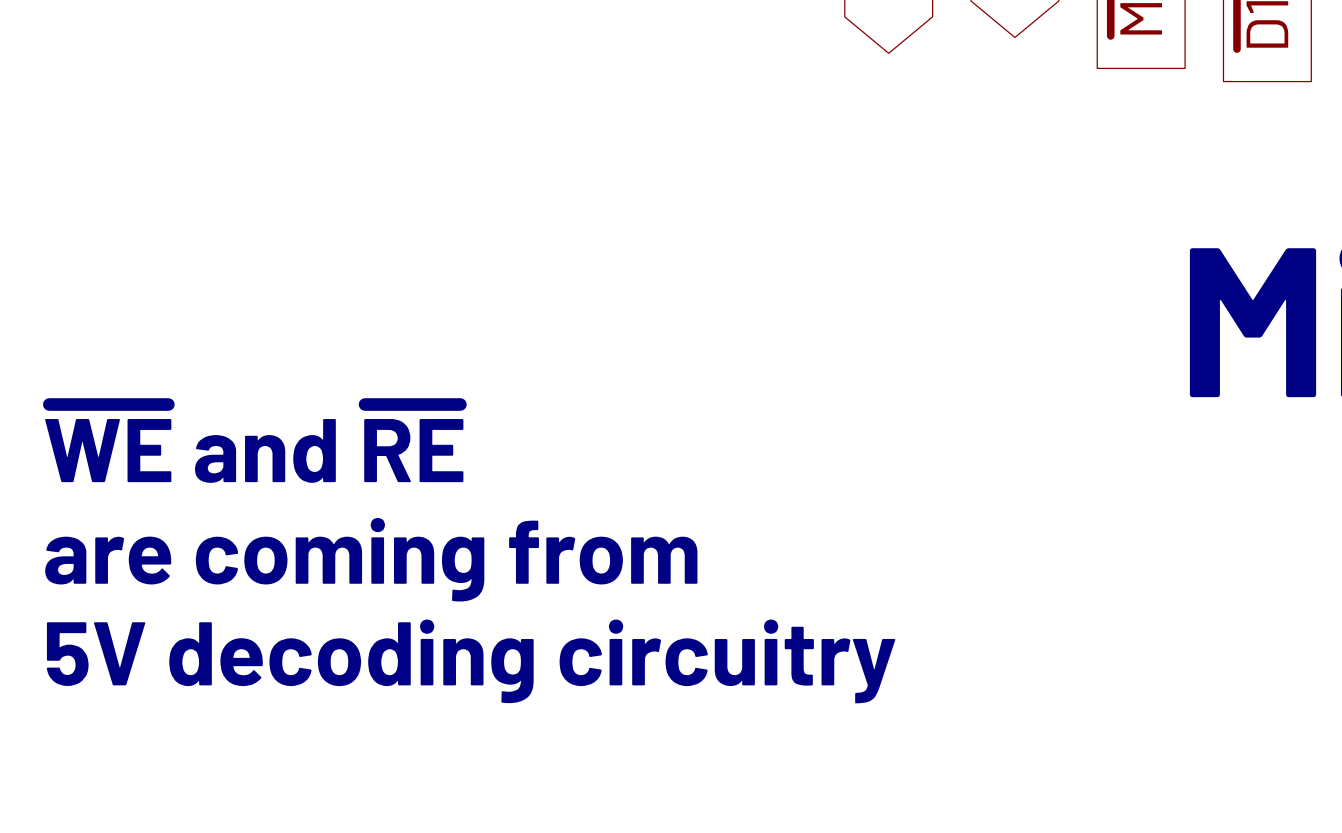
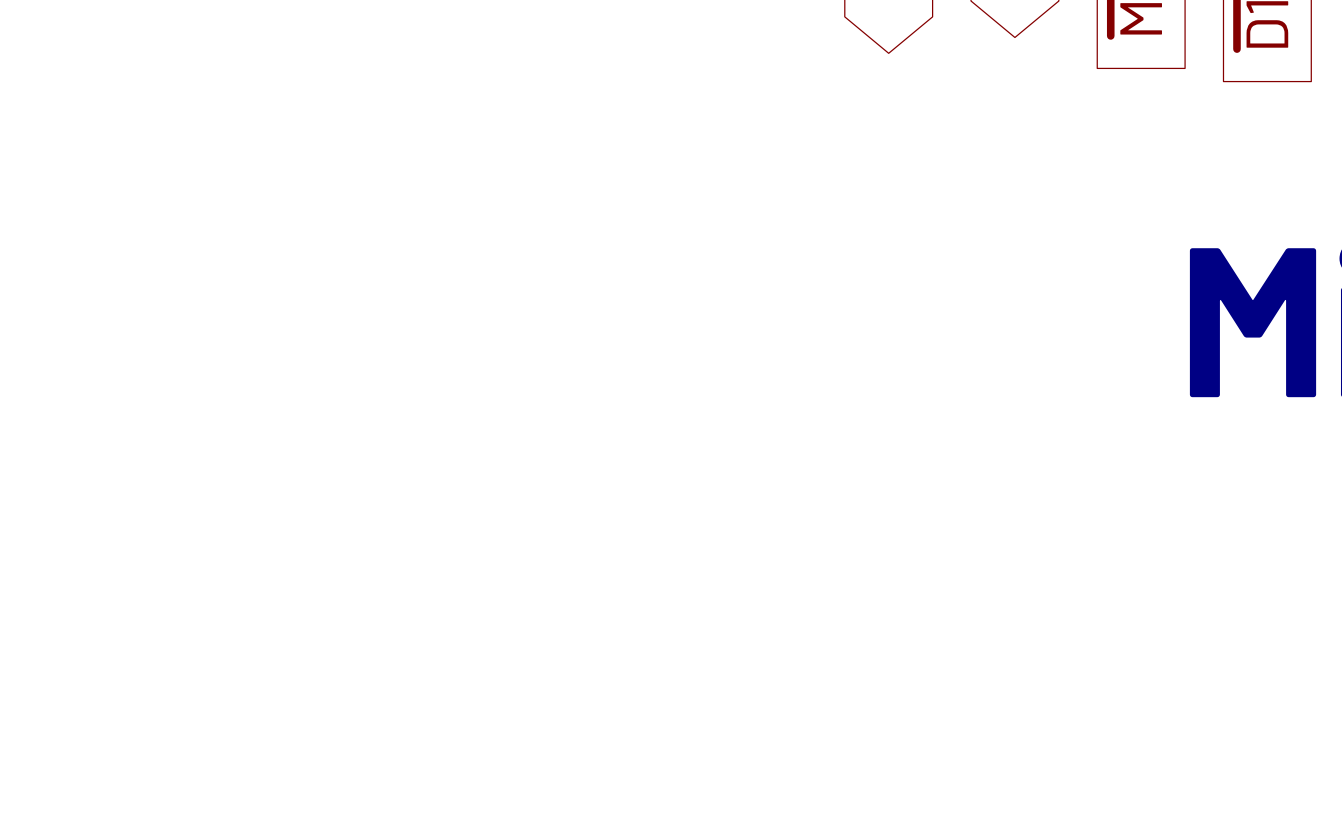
text: ~{WE} and ~{RE} (254, 443) -> none
text: are coming from (371, 559) -> none
text: 5V decoding circuitry (471, 661) -> none

